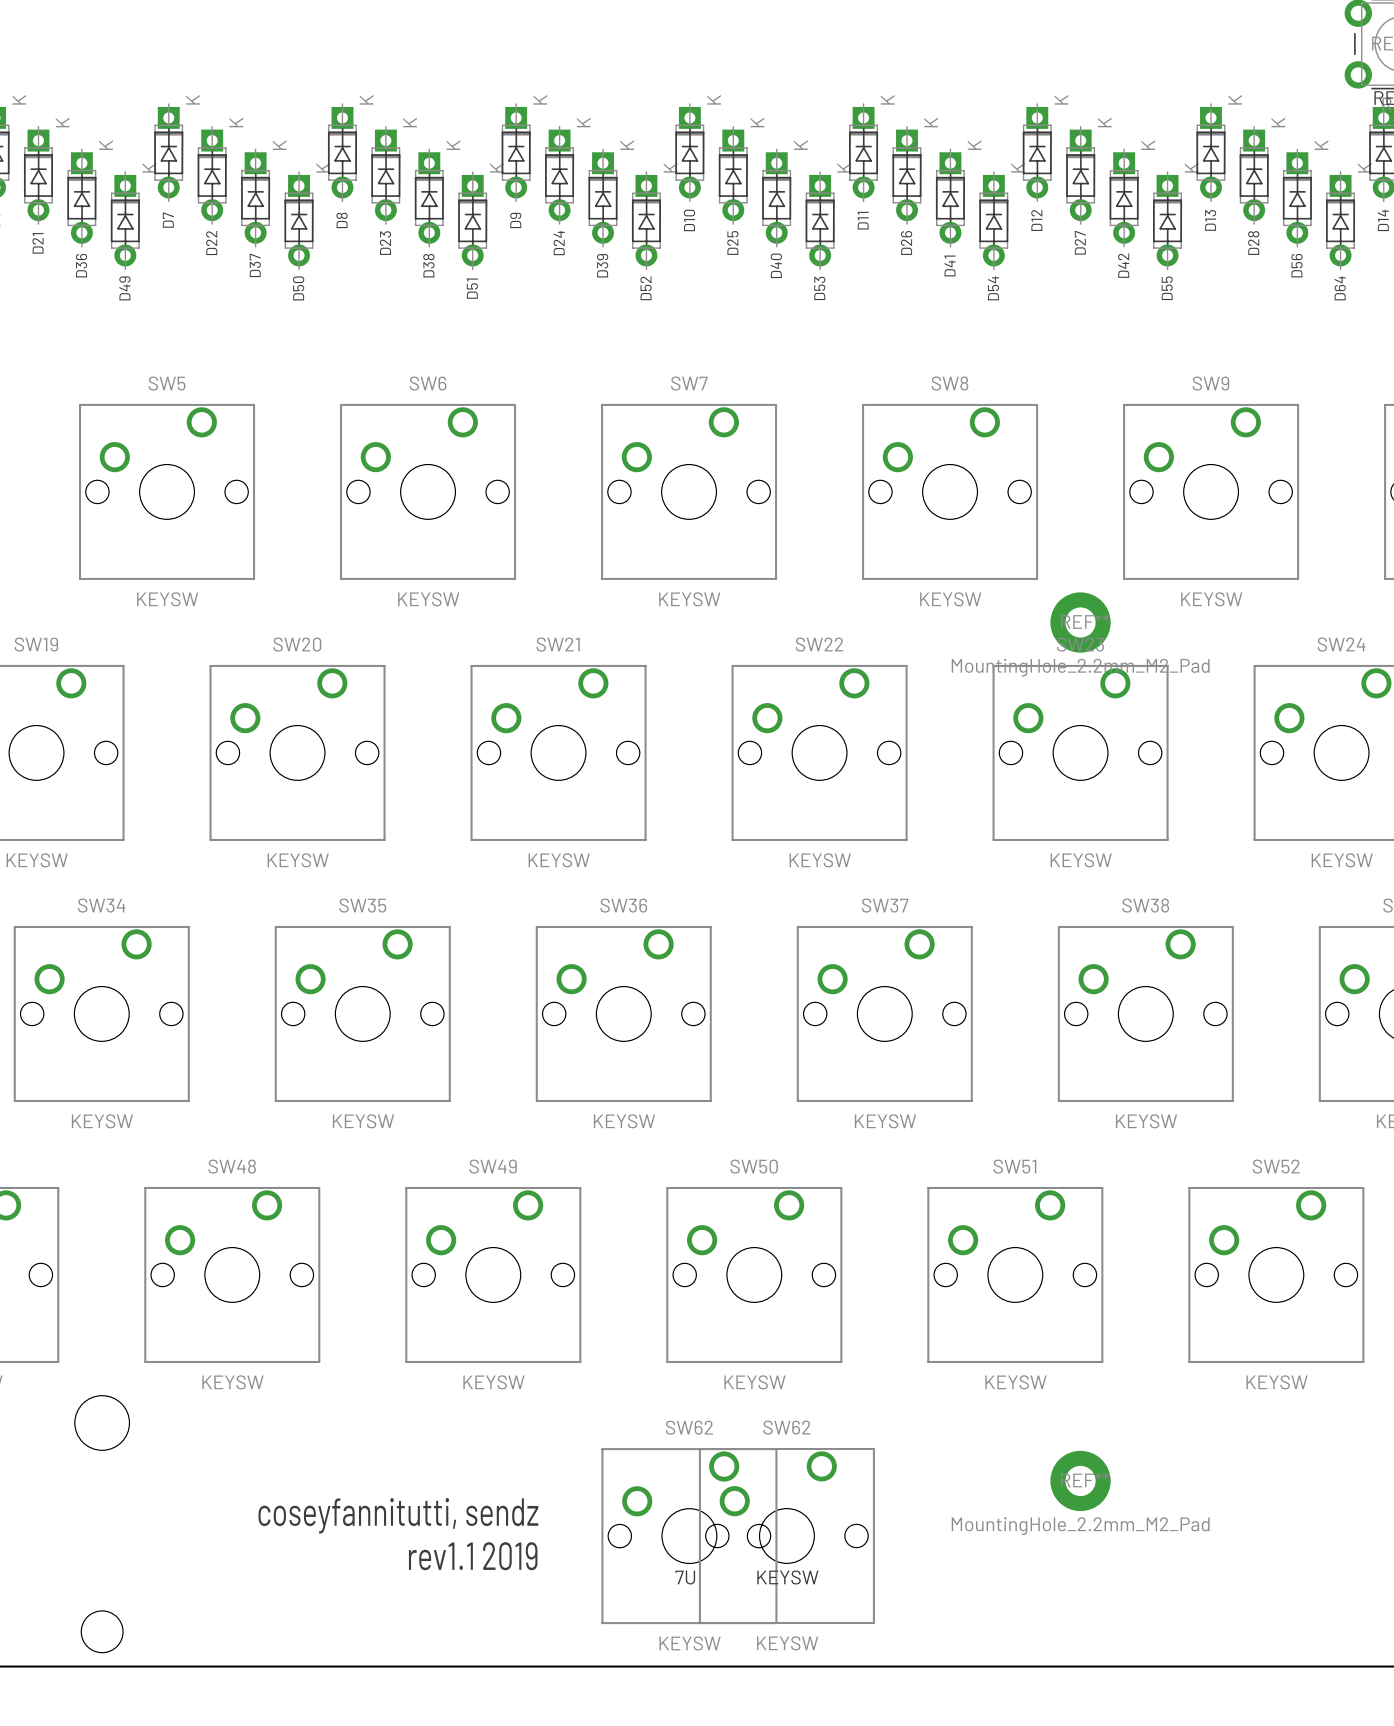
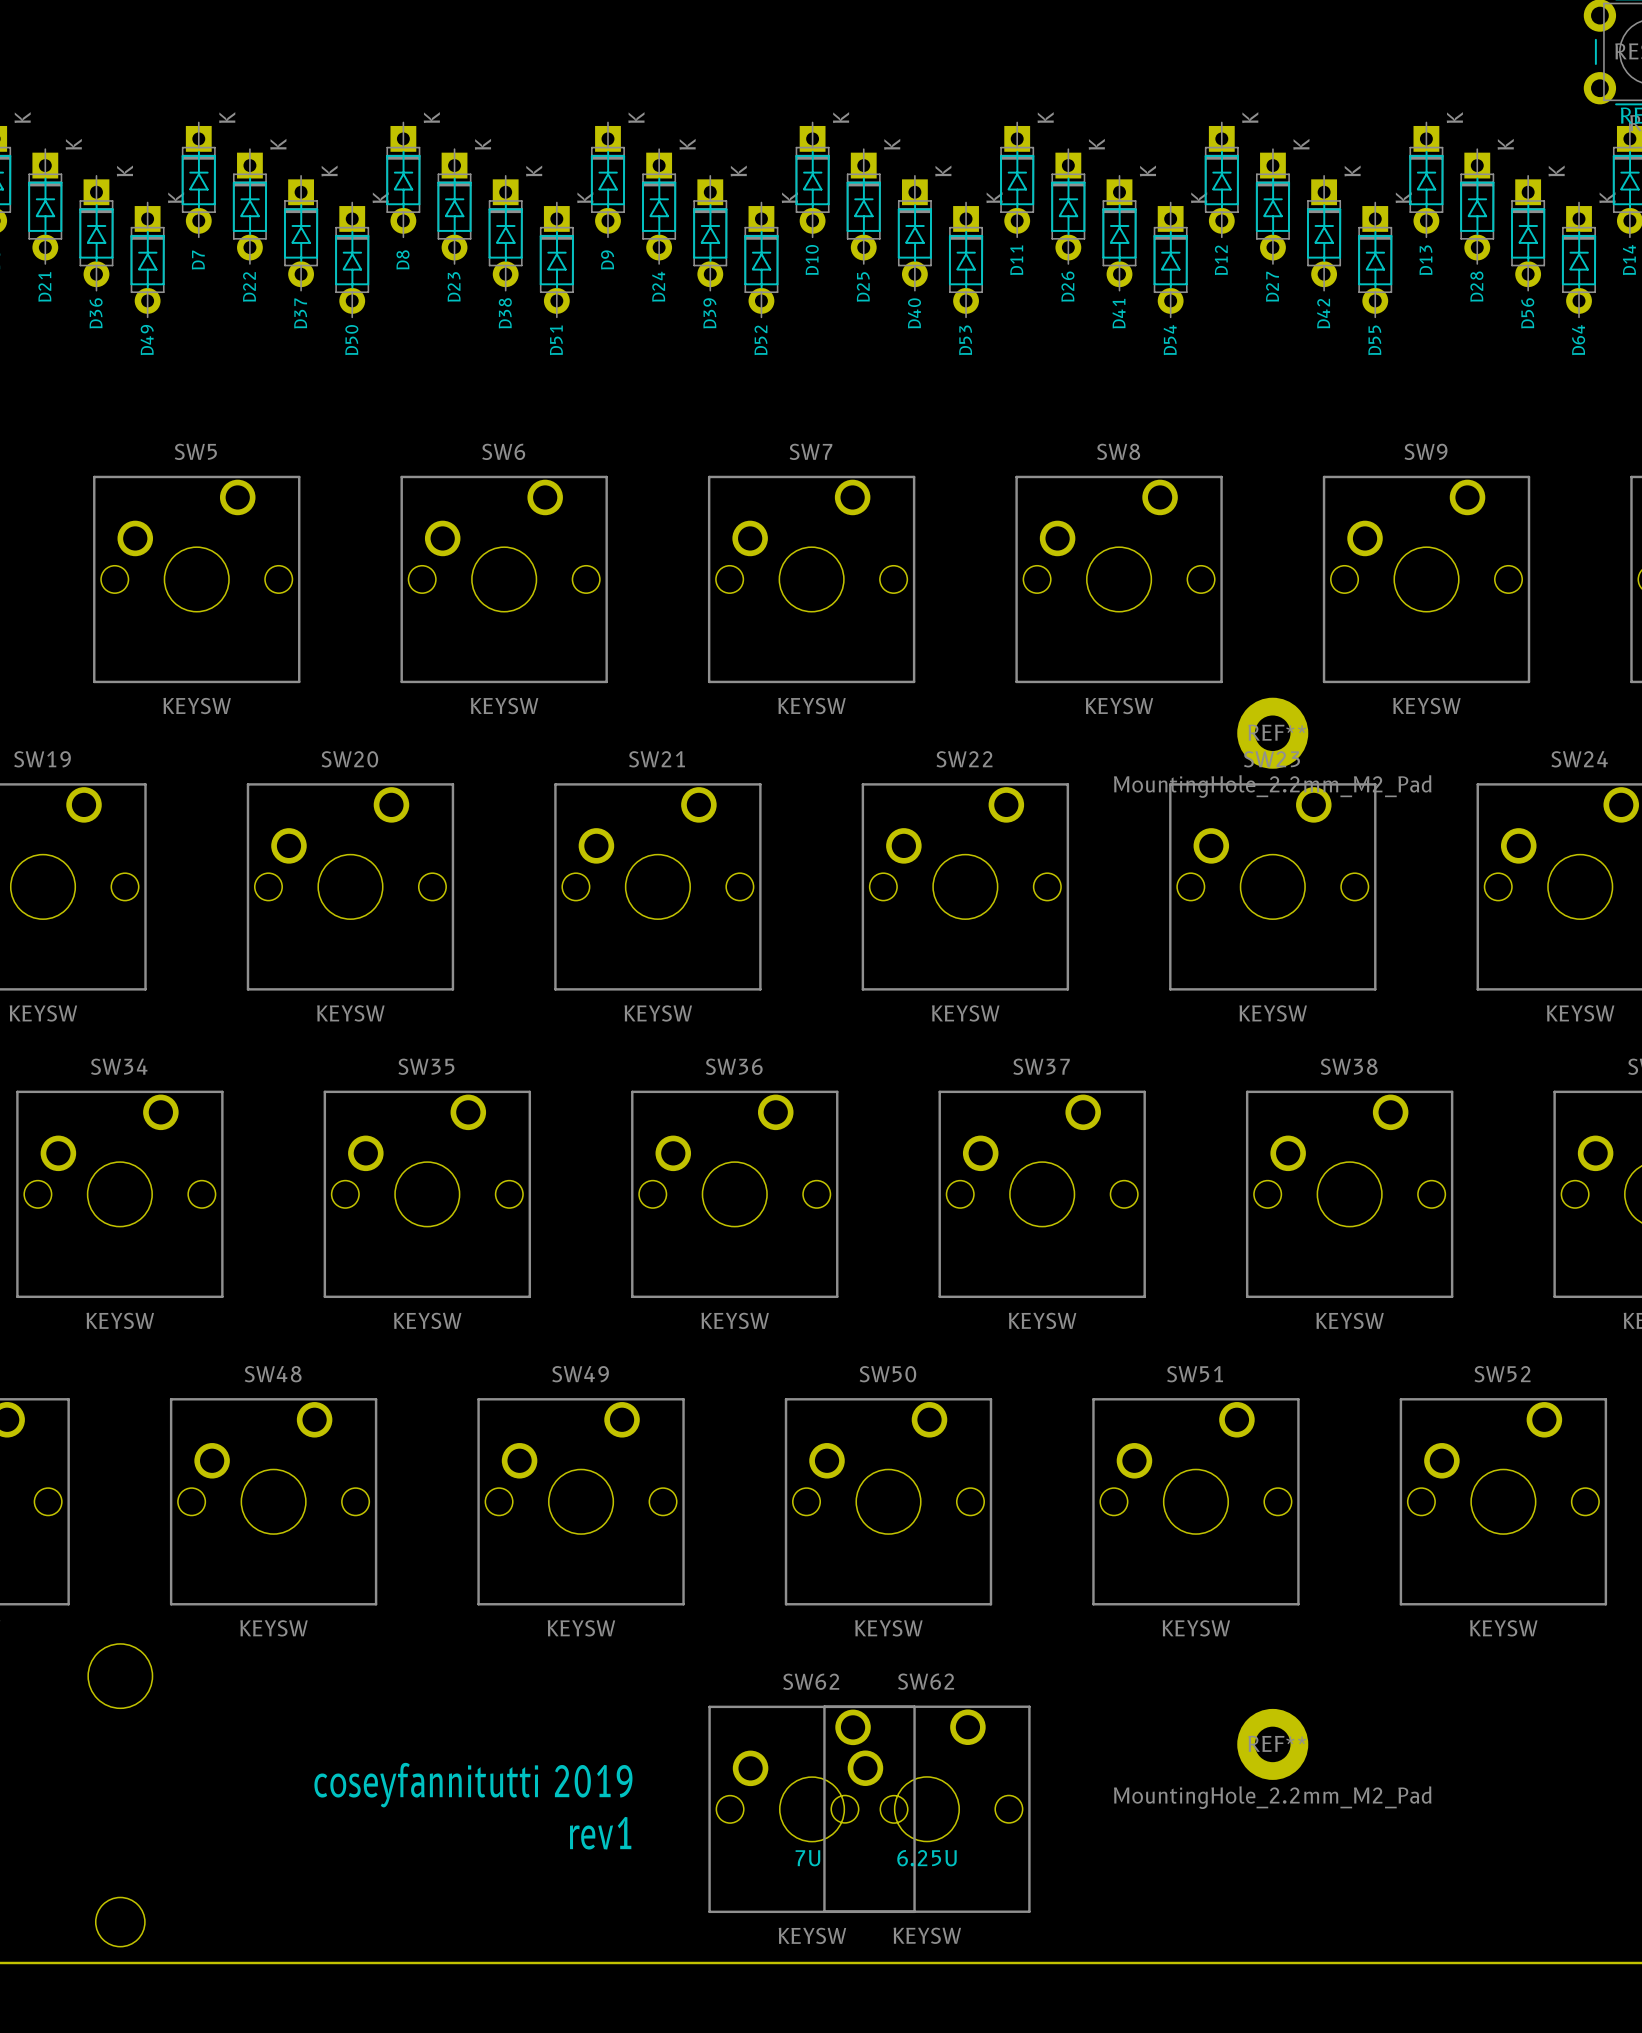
text: coseyfannitutti, sendz (398, 1515) -> coseyfannitutti 2019 (473, 1785)
text: rev1.1 2019 (473, 1556) -> rev1 (600, 1833)
part value: KEYSW (787, 1577) -> 6.25U (926, 1858)

